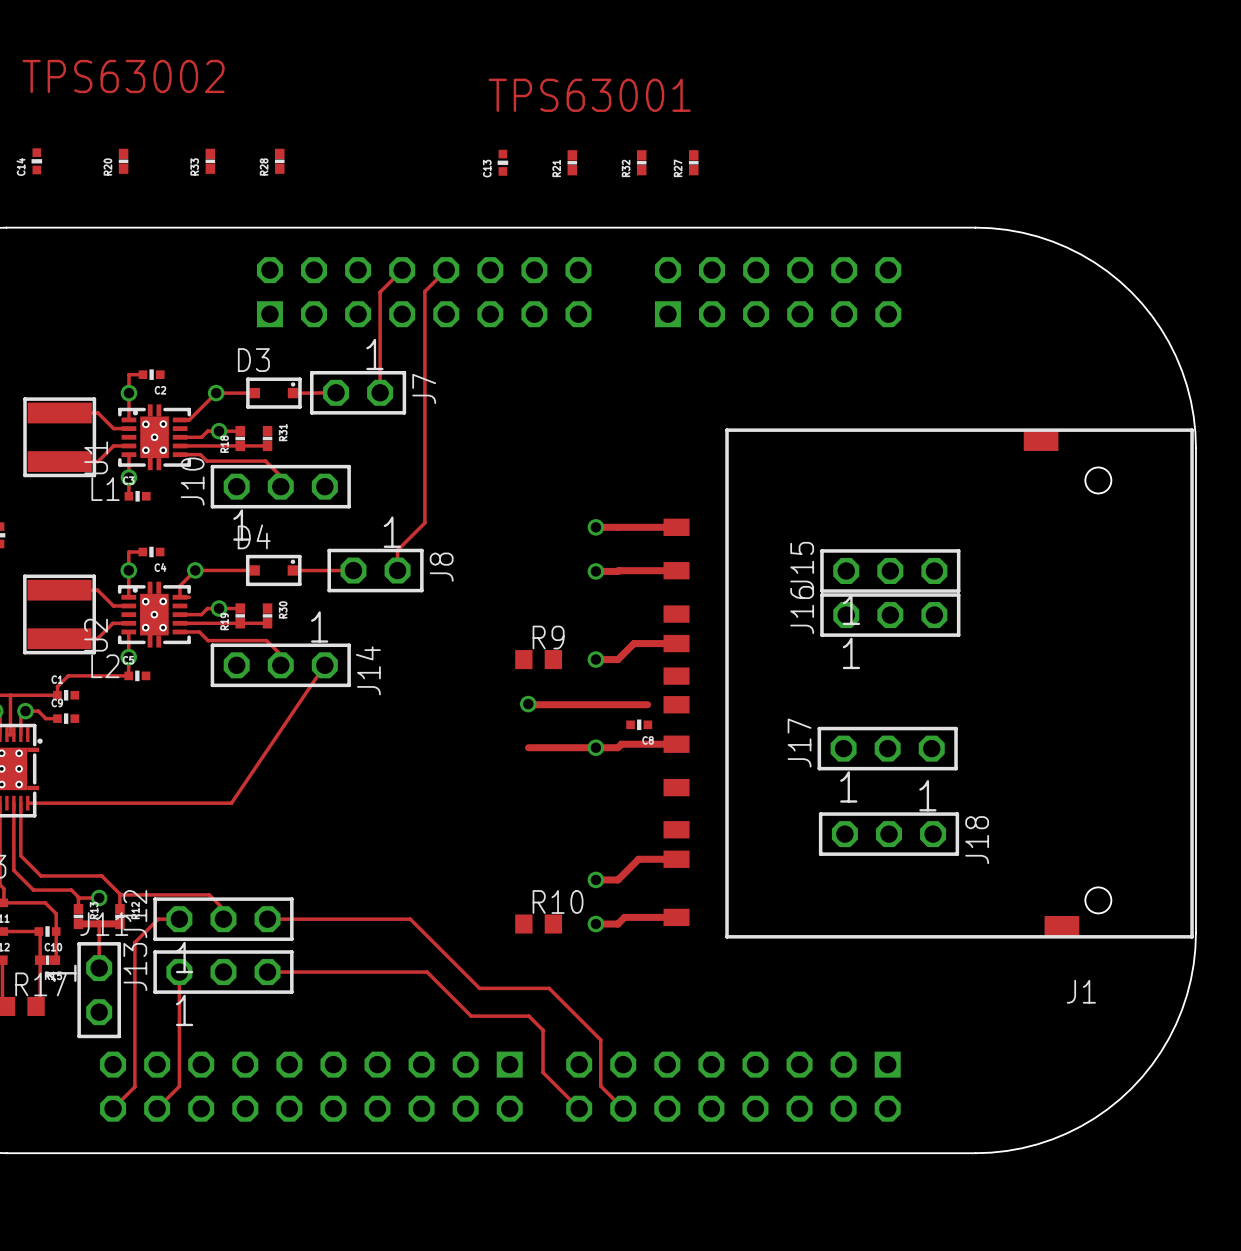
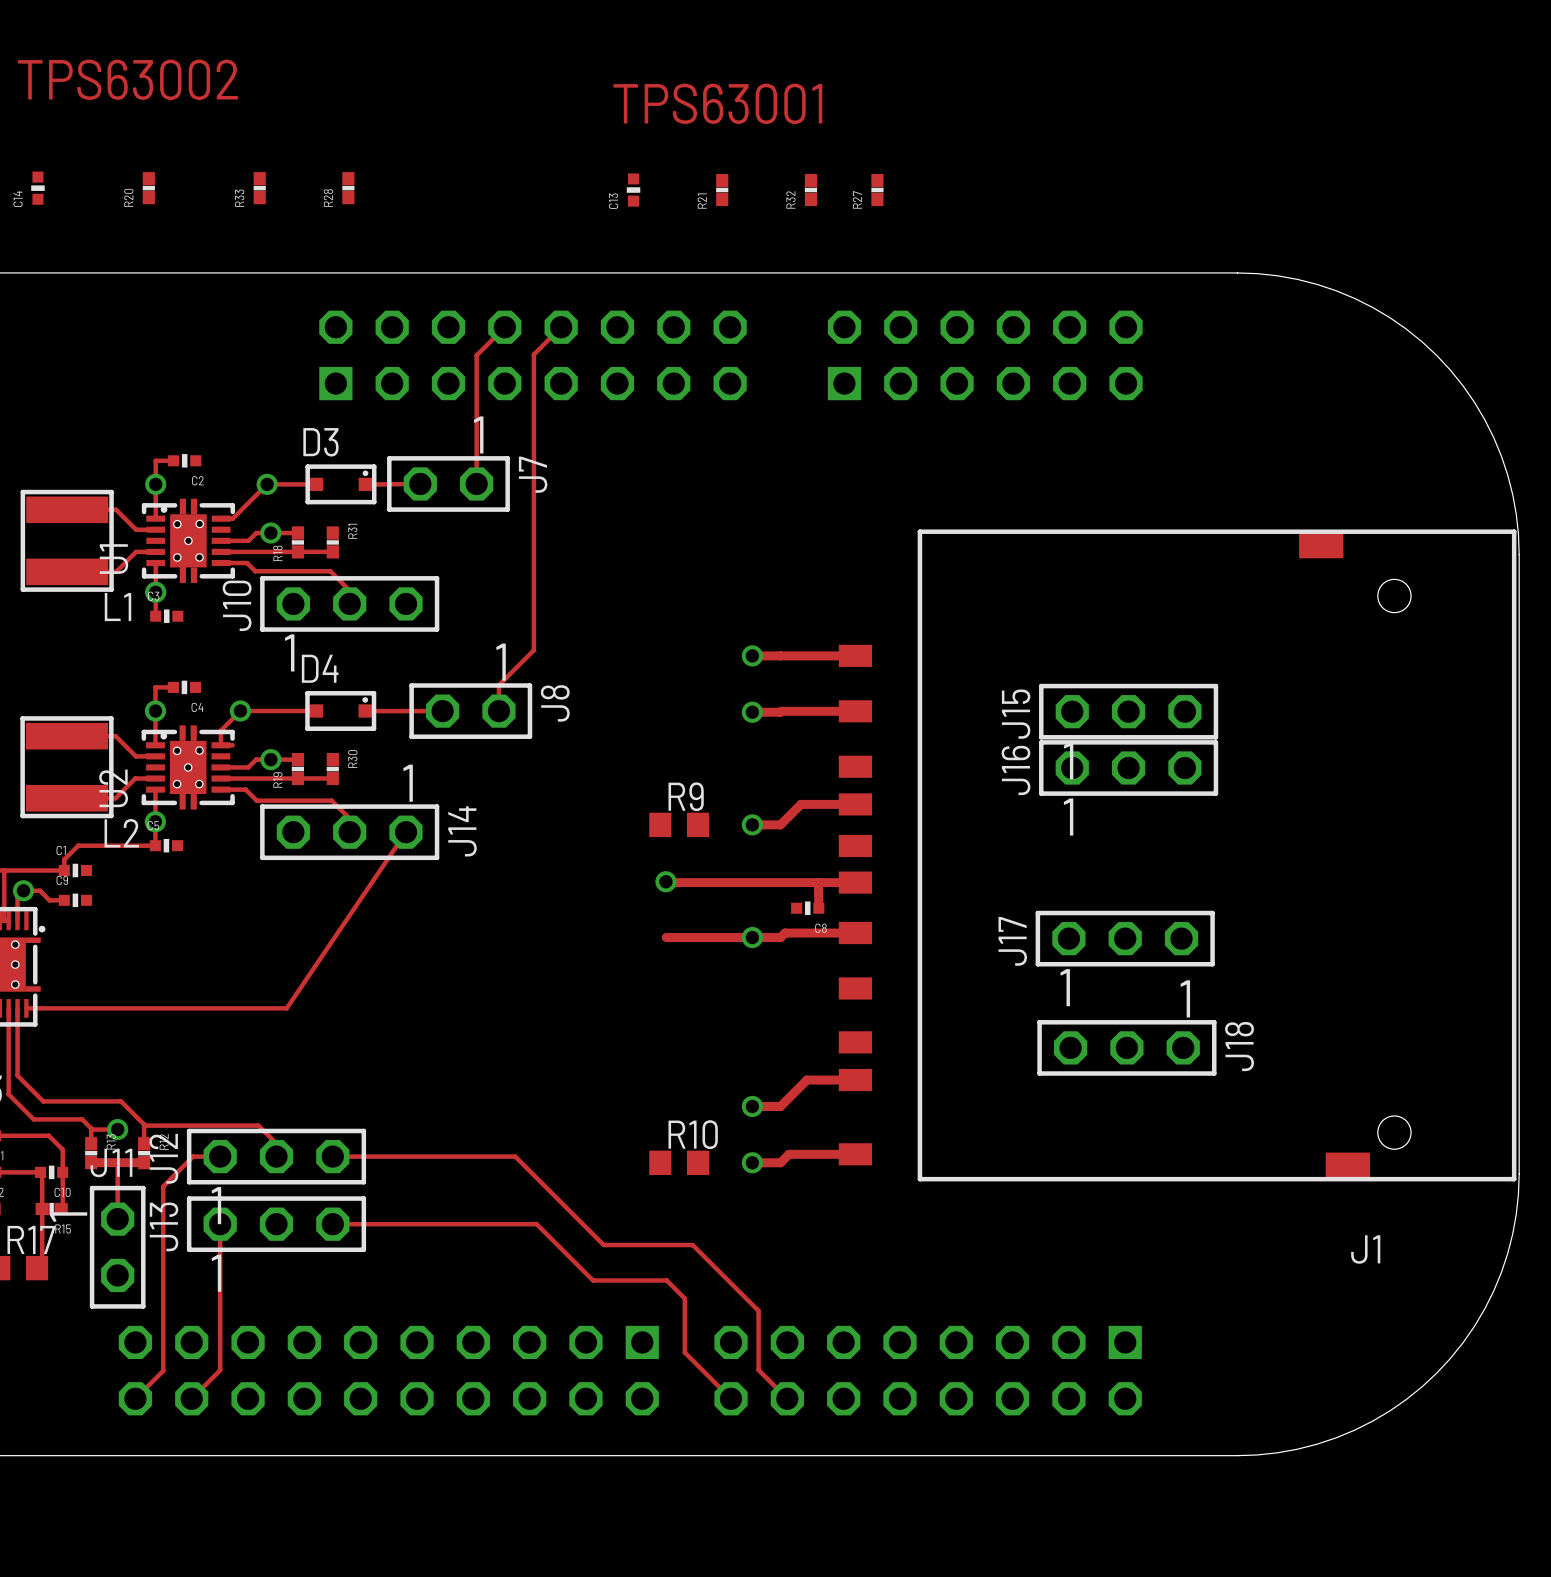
track: none -> (855, 882) (818, 882) (818, 908)

